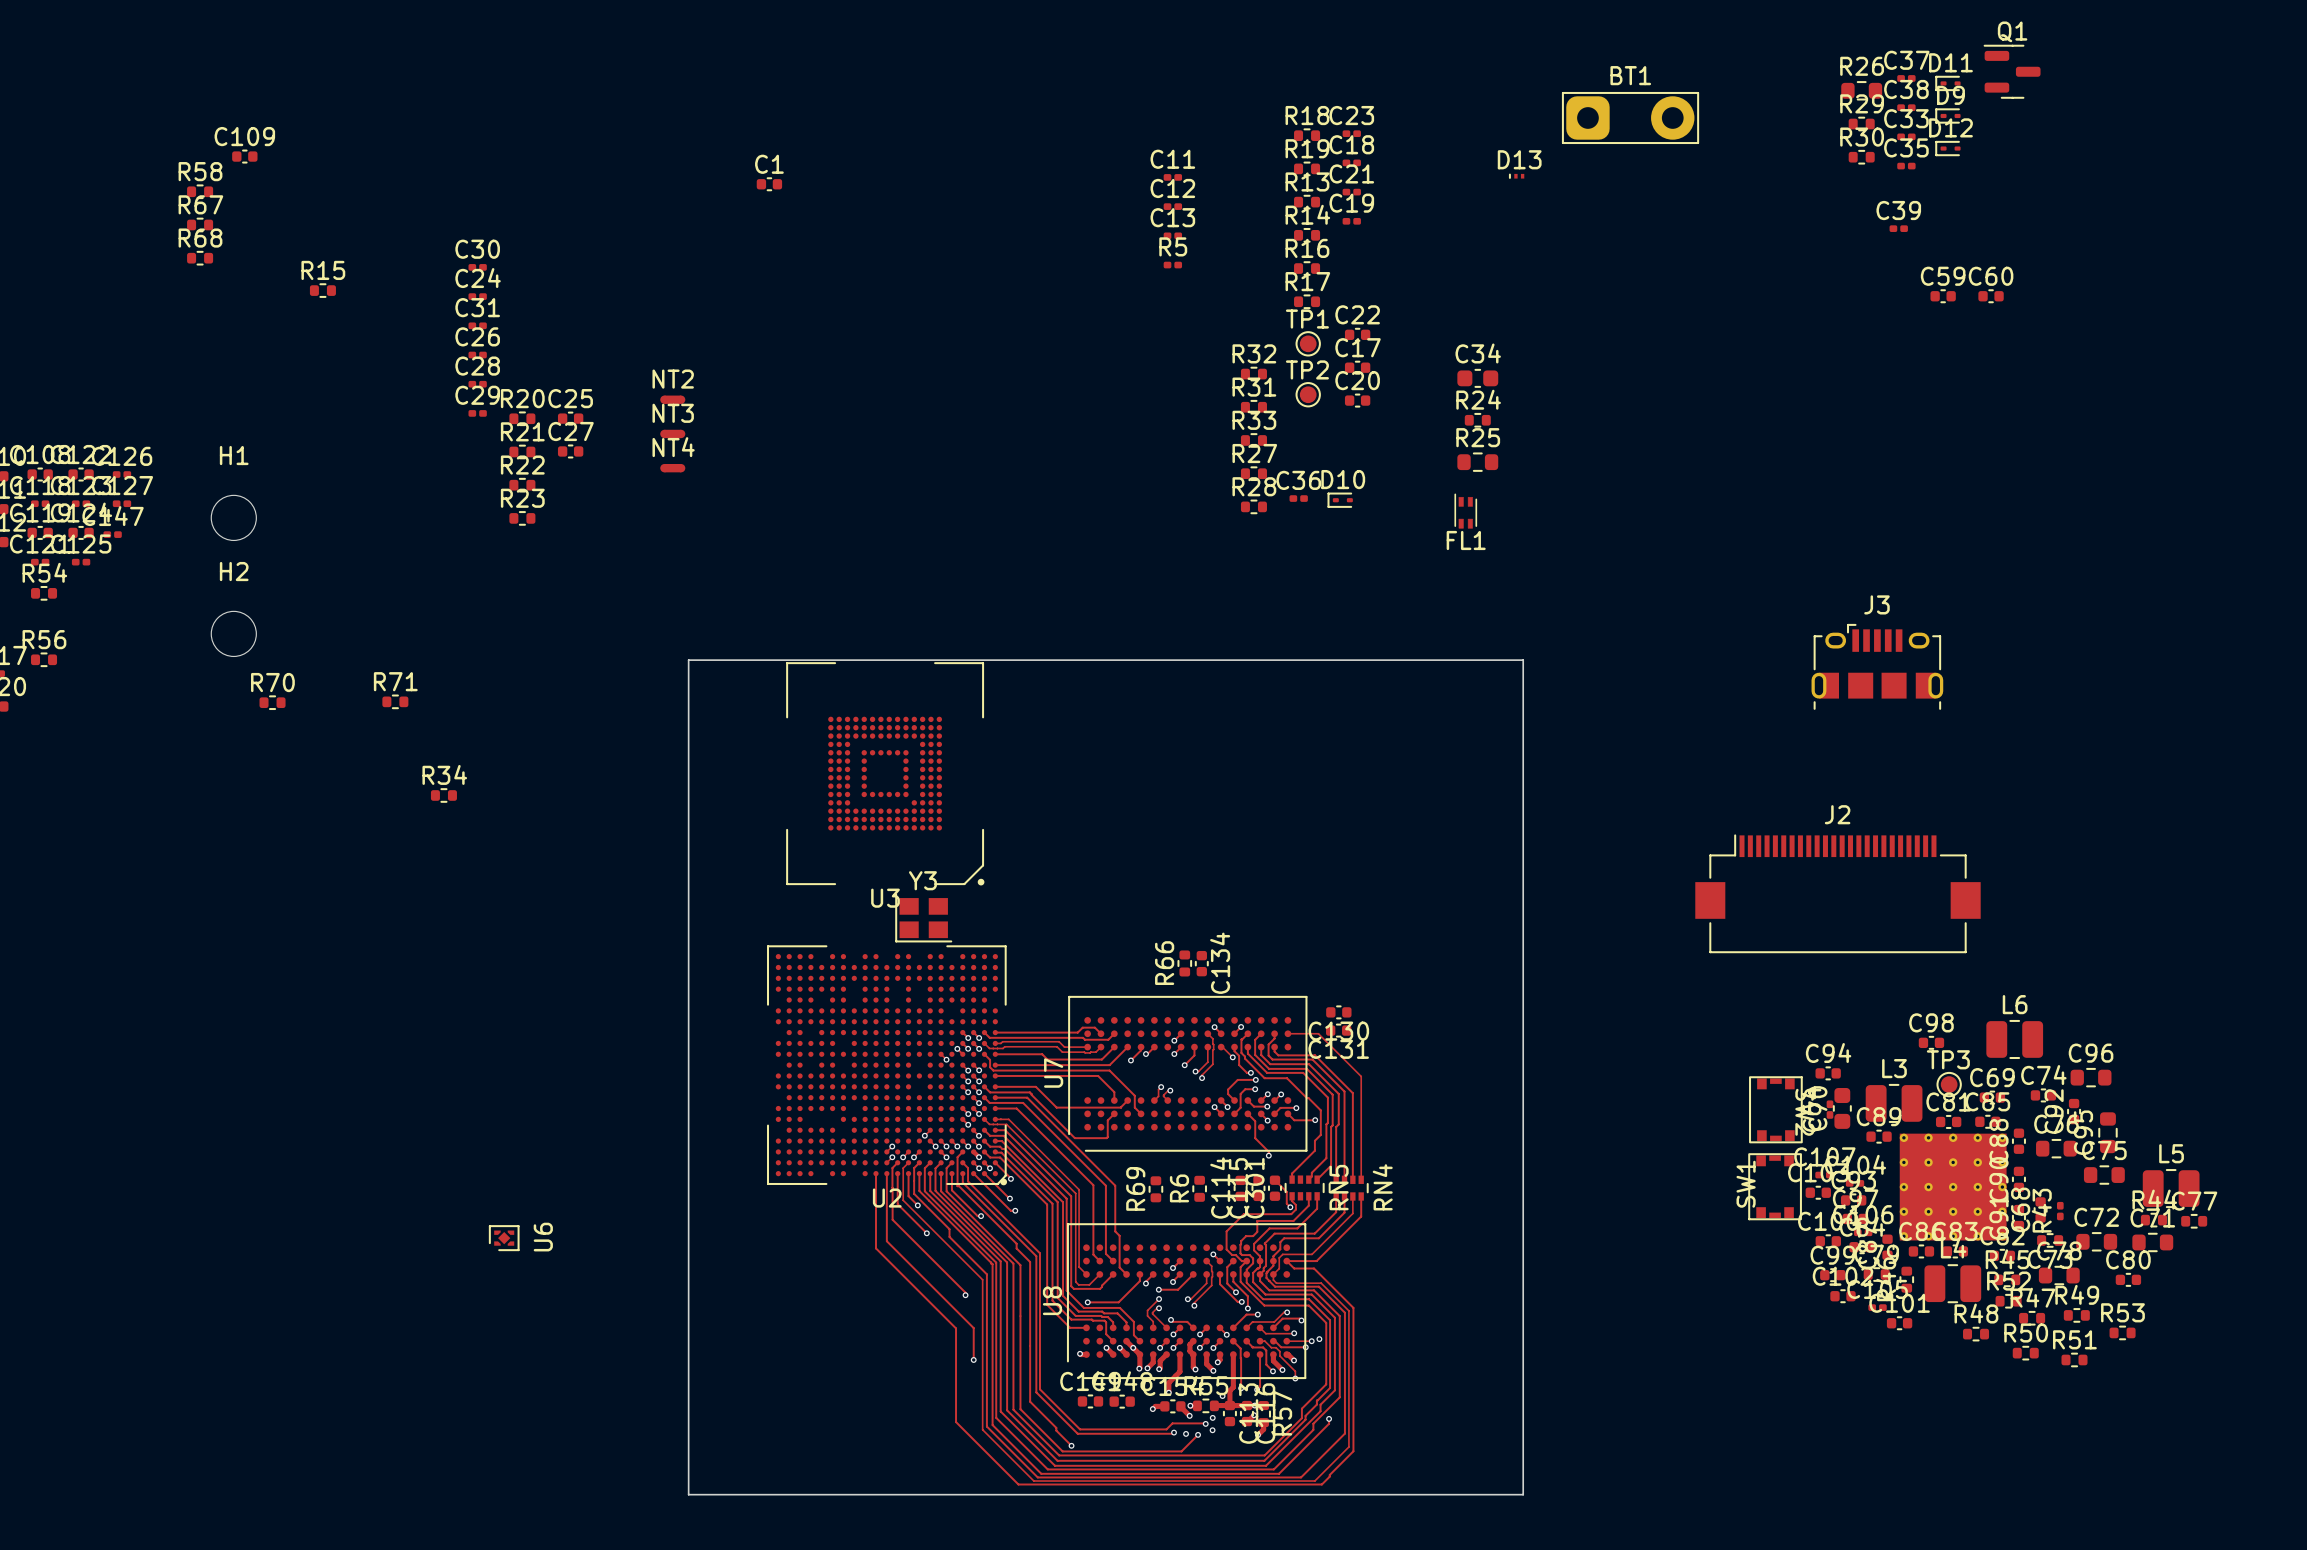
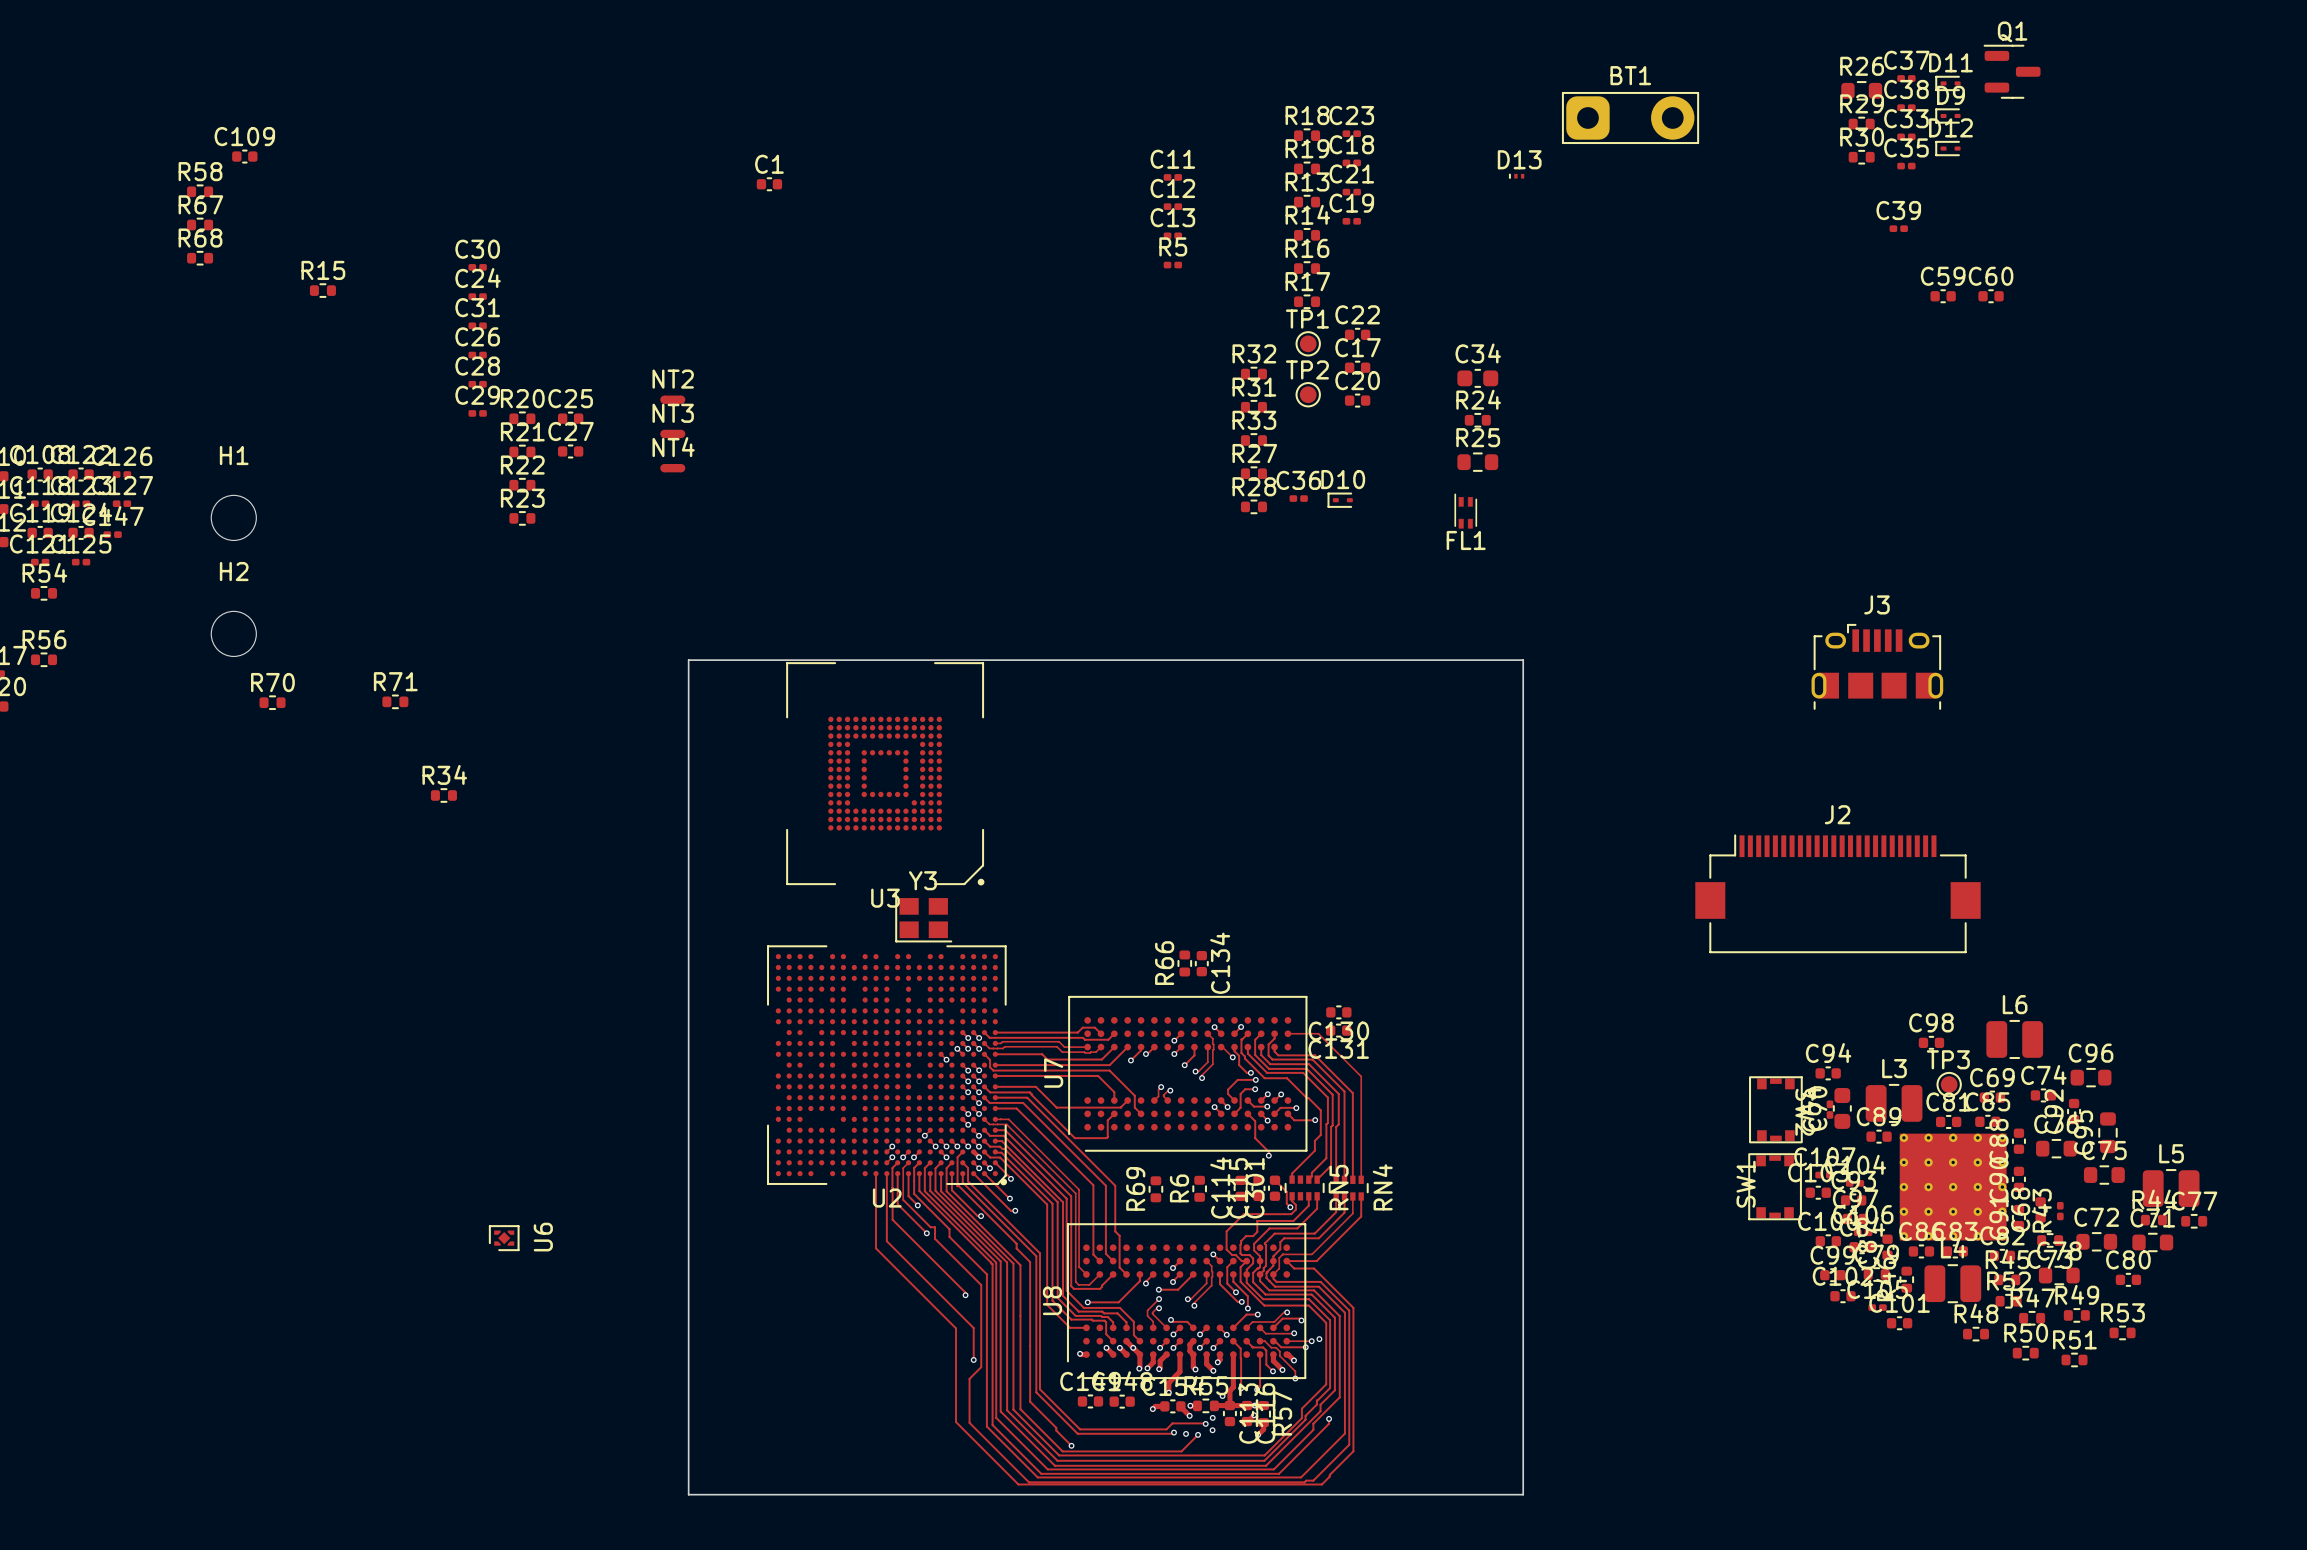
track: (903, 1200) (982, 1279) (982, 1429) (1033, 1481) (1314, 1481) (1348, 1446) (1348, 1310) (1321, 1283) (1276, 1283) (1273, 1278) -> (903, 1199) (930, 1227) (935, 1227) (935, 1238) (981, 1285) (981, 1367) (969, 1378) (969, 1422) (1028, 1482) (1304, 1482) (1313, 1480) (1349, 1444) (1349, 1310) (1320, 1281) (1276, 1281) (1273, 1278)

